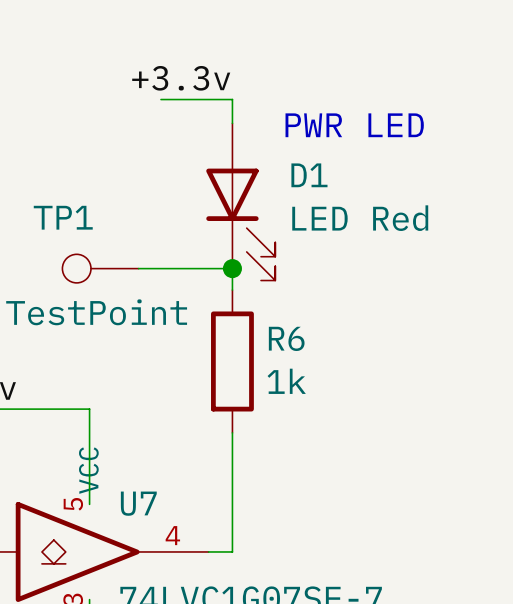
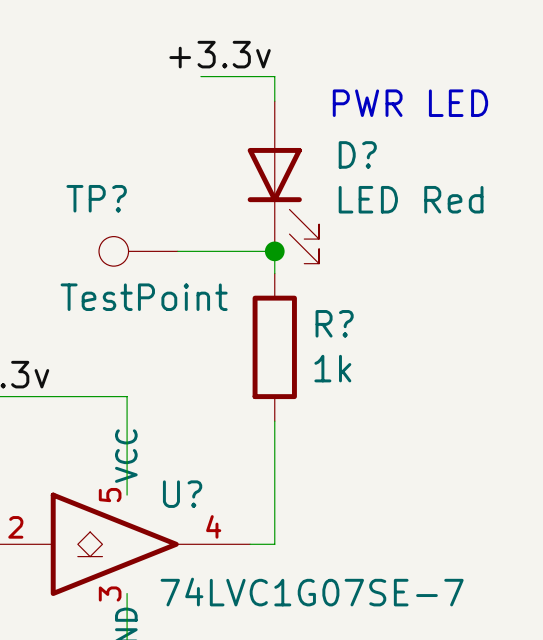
D1 name: D1 (309, 175) -> D? (357, 154)
TP1 name: TP1 (63, 217) -> TP? (96, 198)
R6 name: R6 (286, 338) -> R? (334, 323)
U7 name: U7 (138, 503) -> U? (182, 494)

